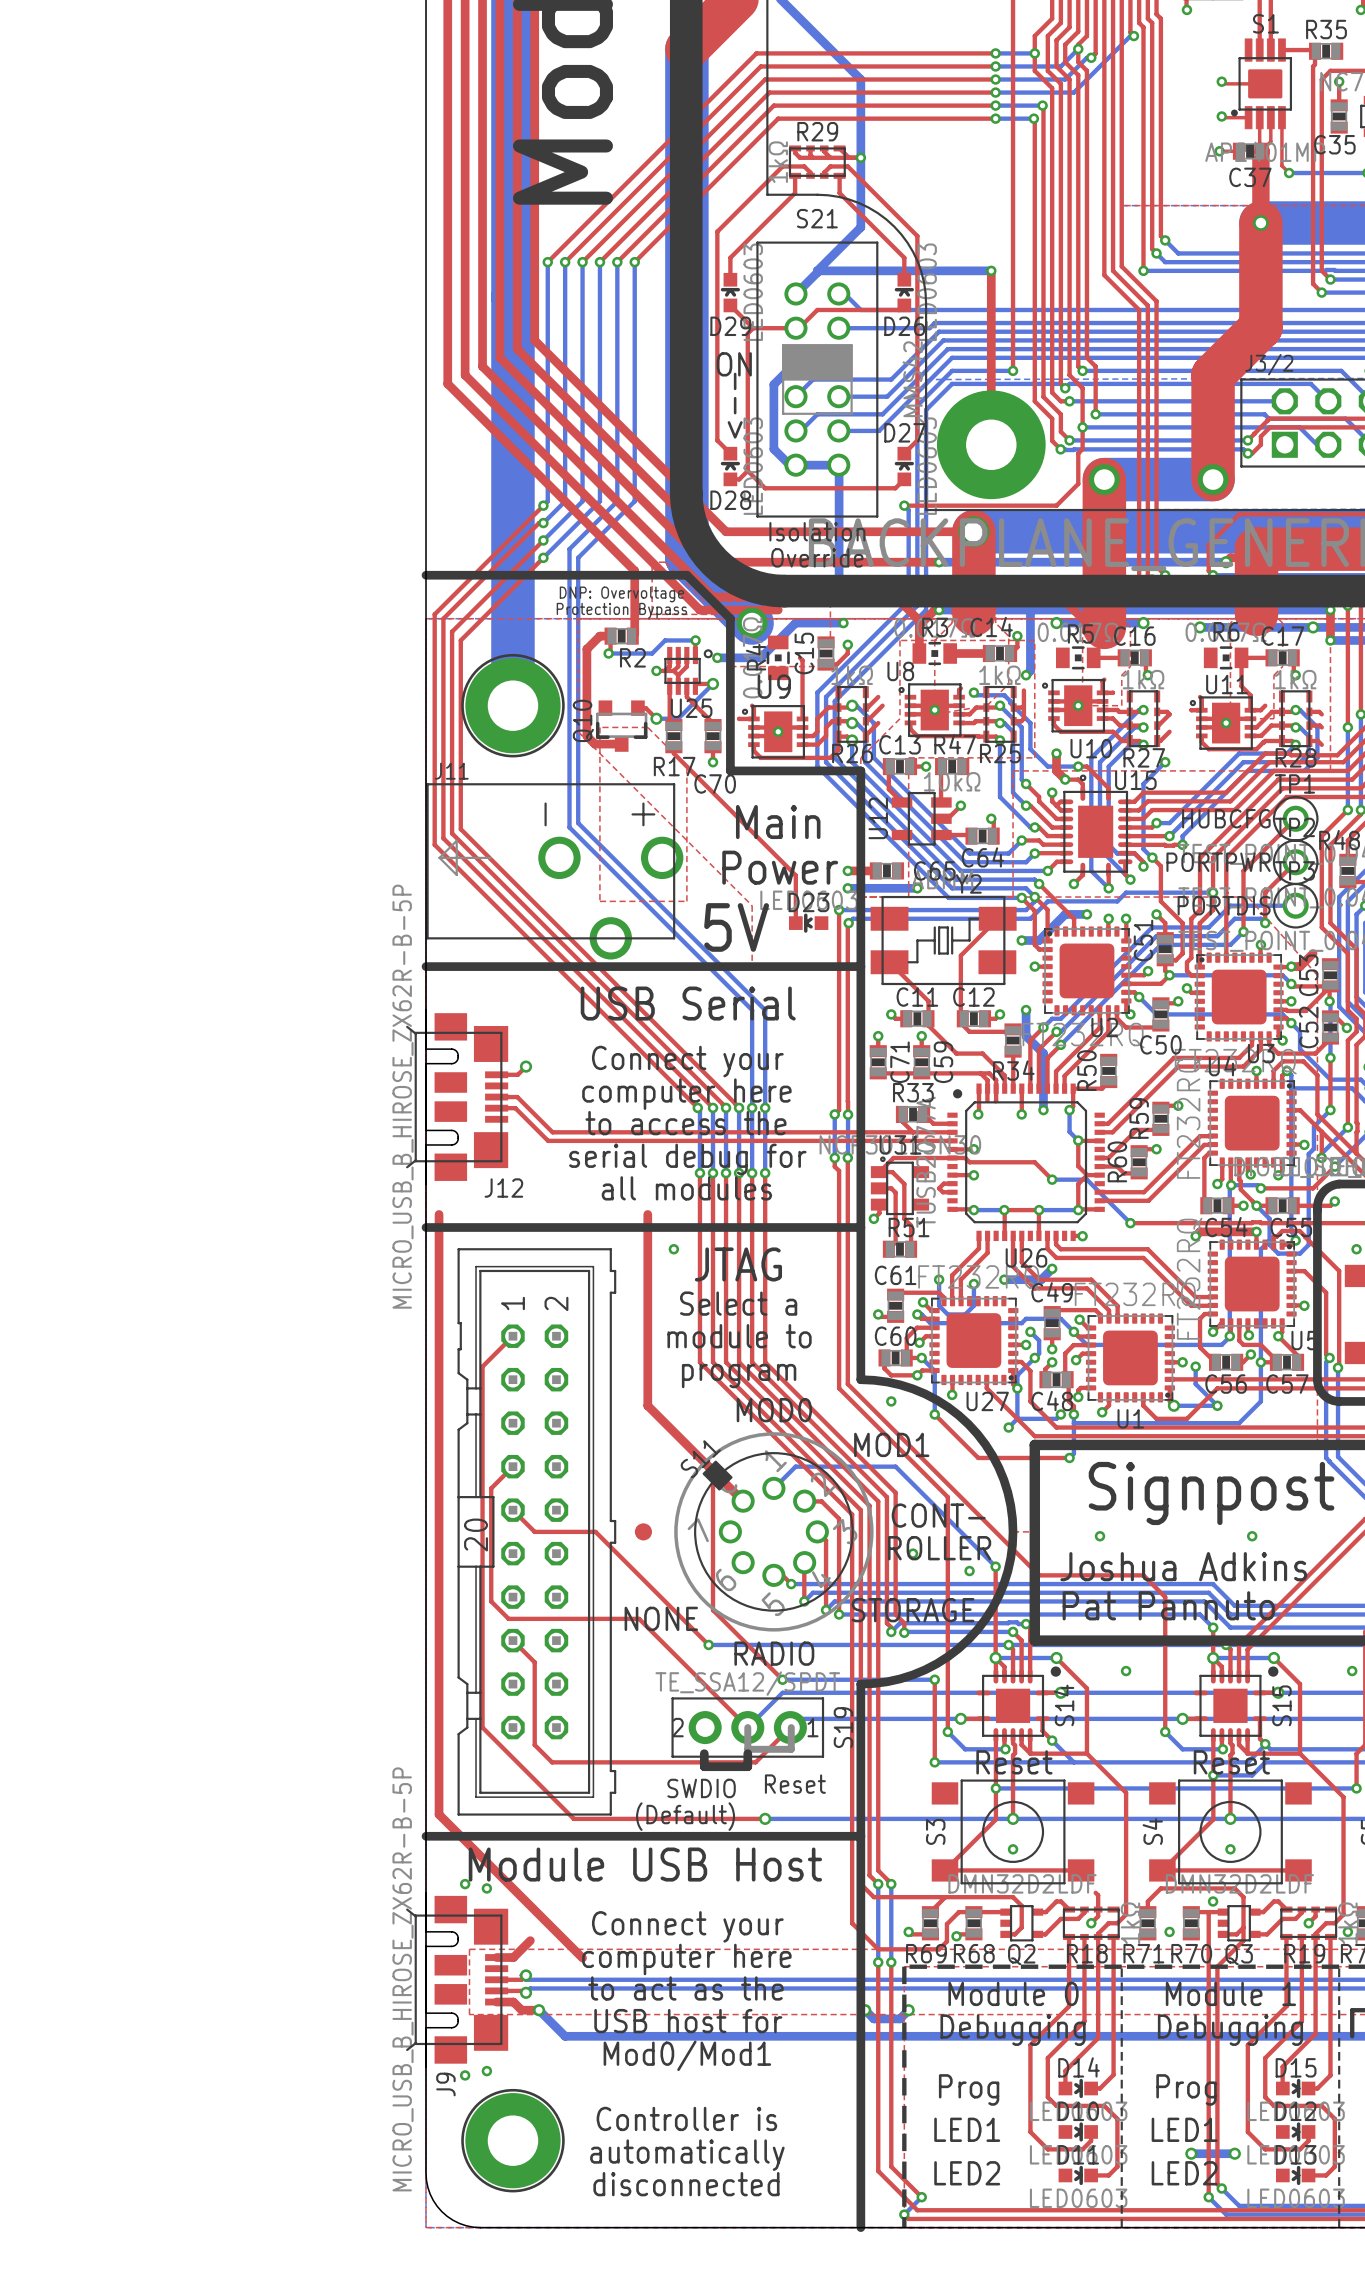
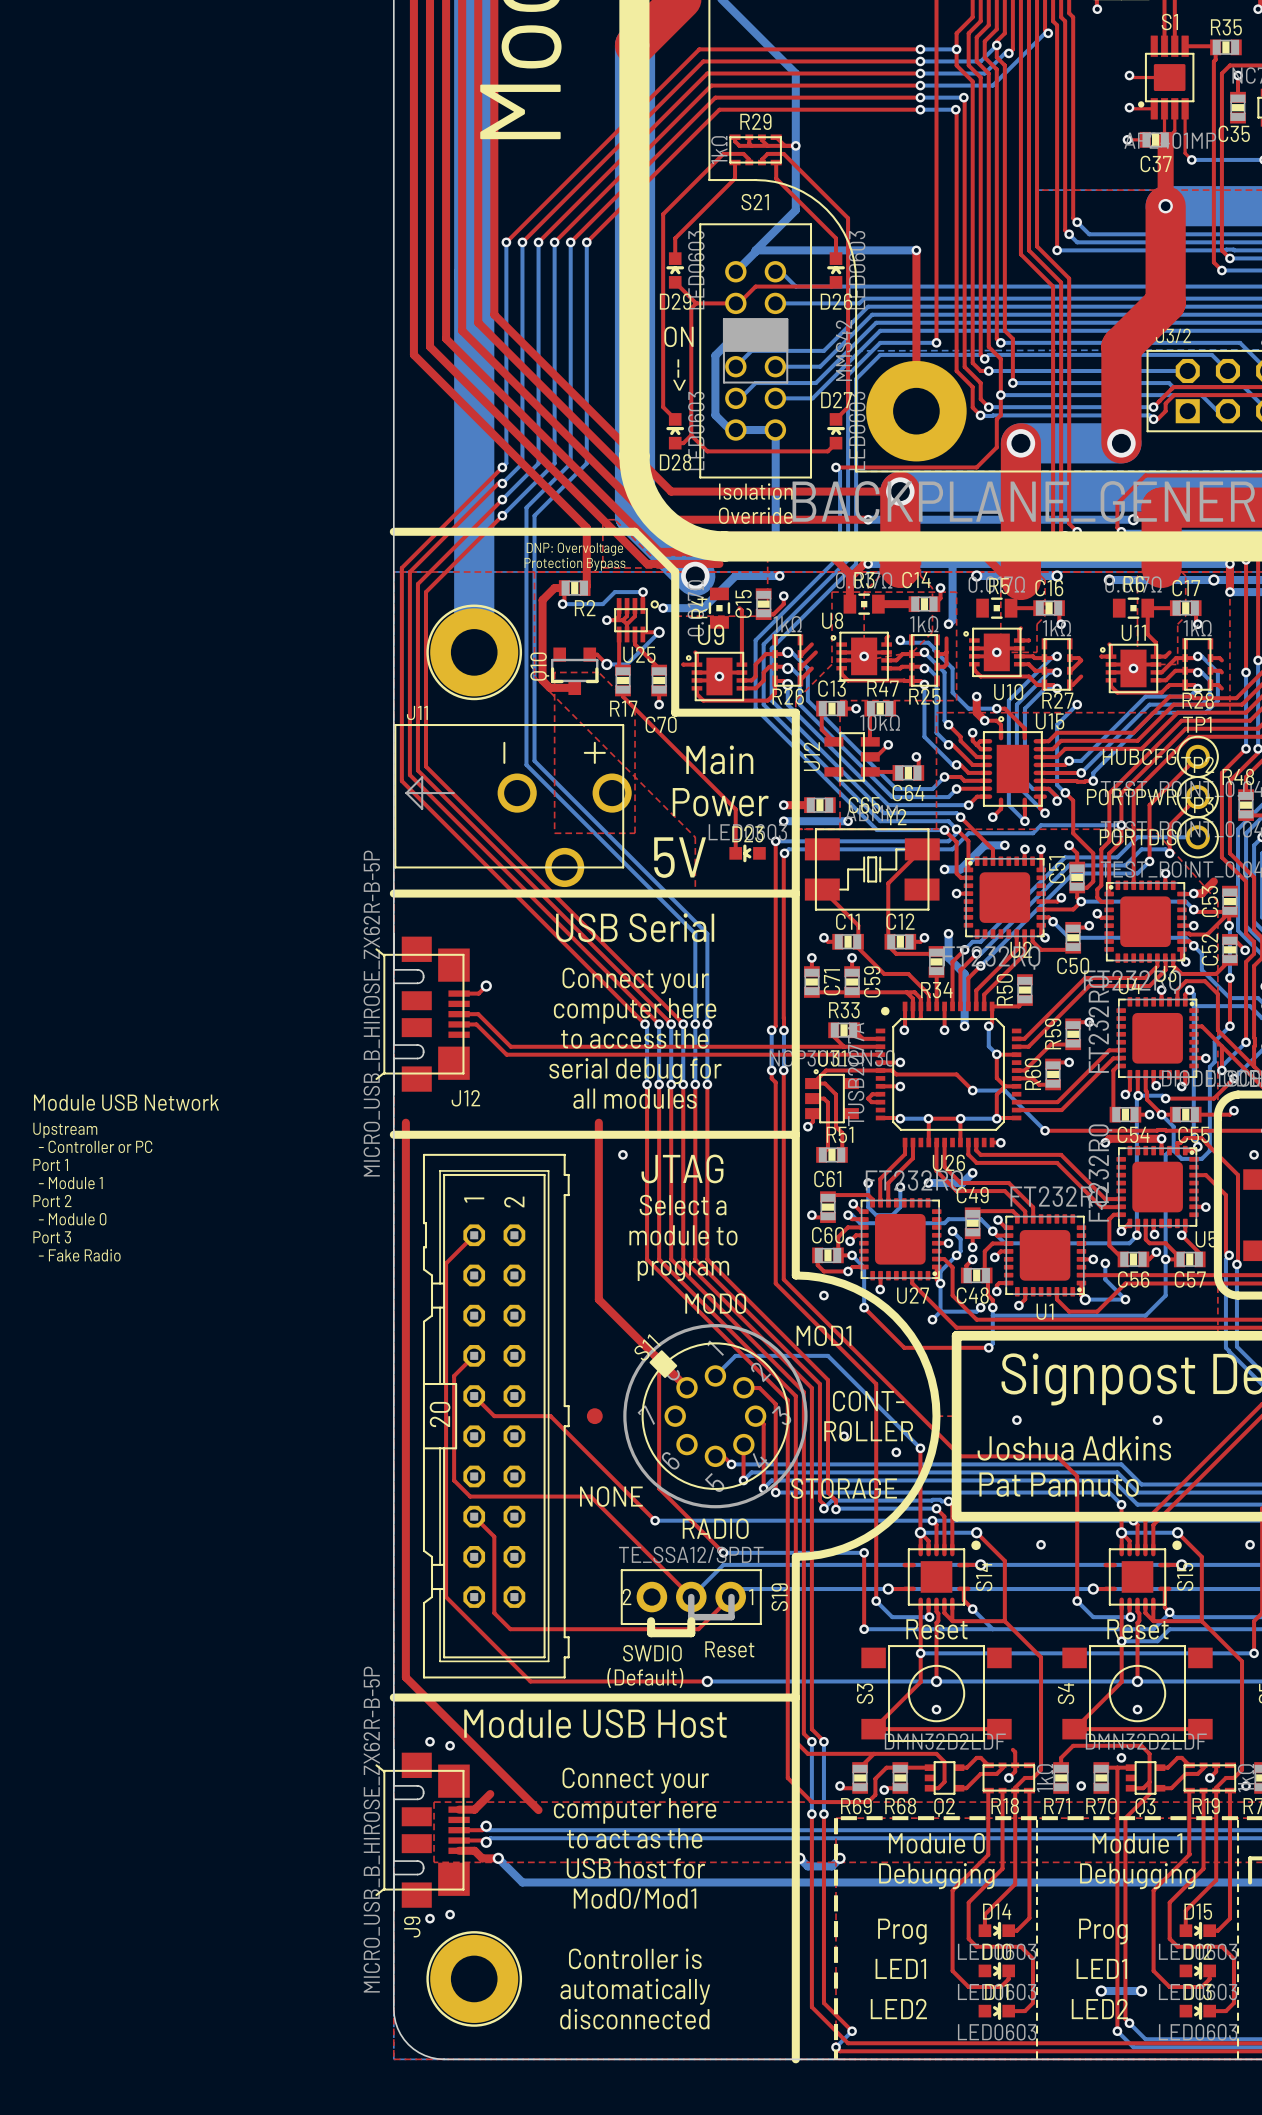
text: none -> Module USB Network (126, 1102)
text: none -> Upstream (65, 1130)
text: none -> - Controller or PC (95, 1146)
text: none -> Port 1 (50, 1164)
text: none -> - Module 1 (70, 1183)
text: none -> Port 2 (52, 1201)
text: none -> - Module 0 (72, 1219)
text: none -> Port 3 (52, 1237)
text: none -> - Fake Radio (79, 1255)

